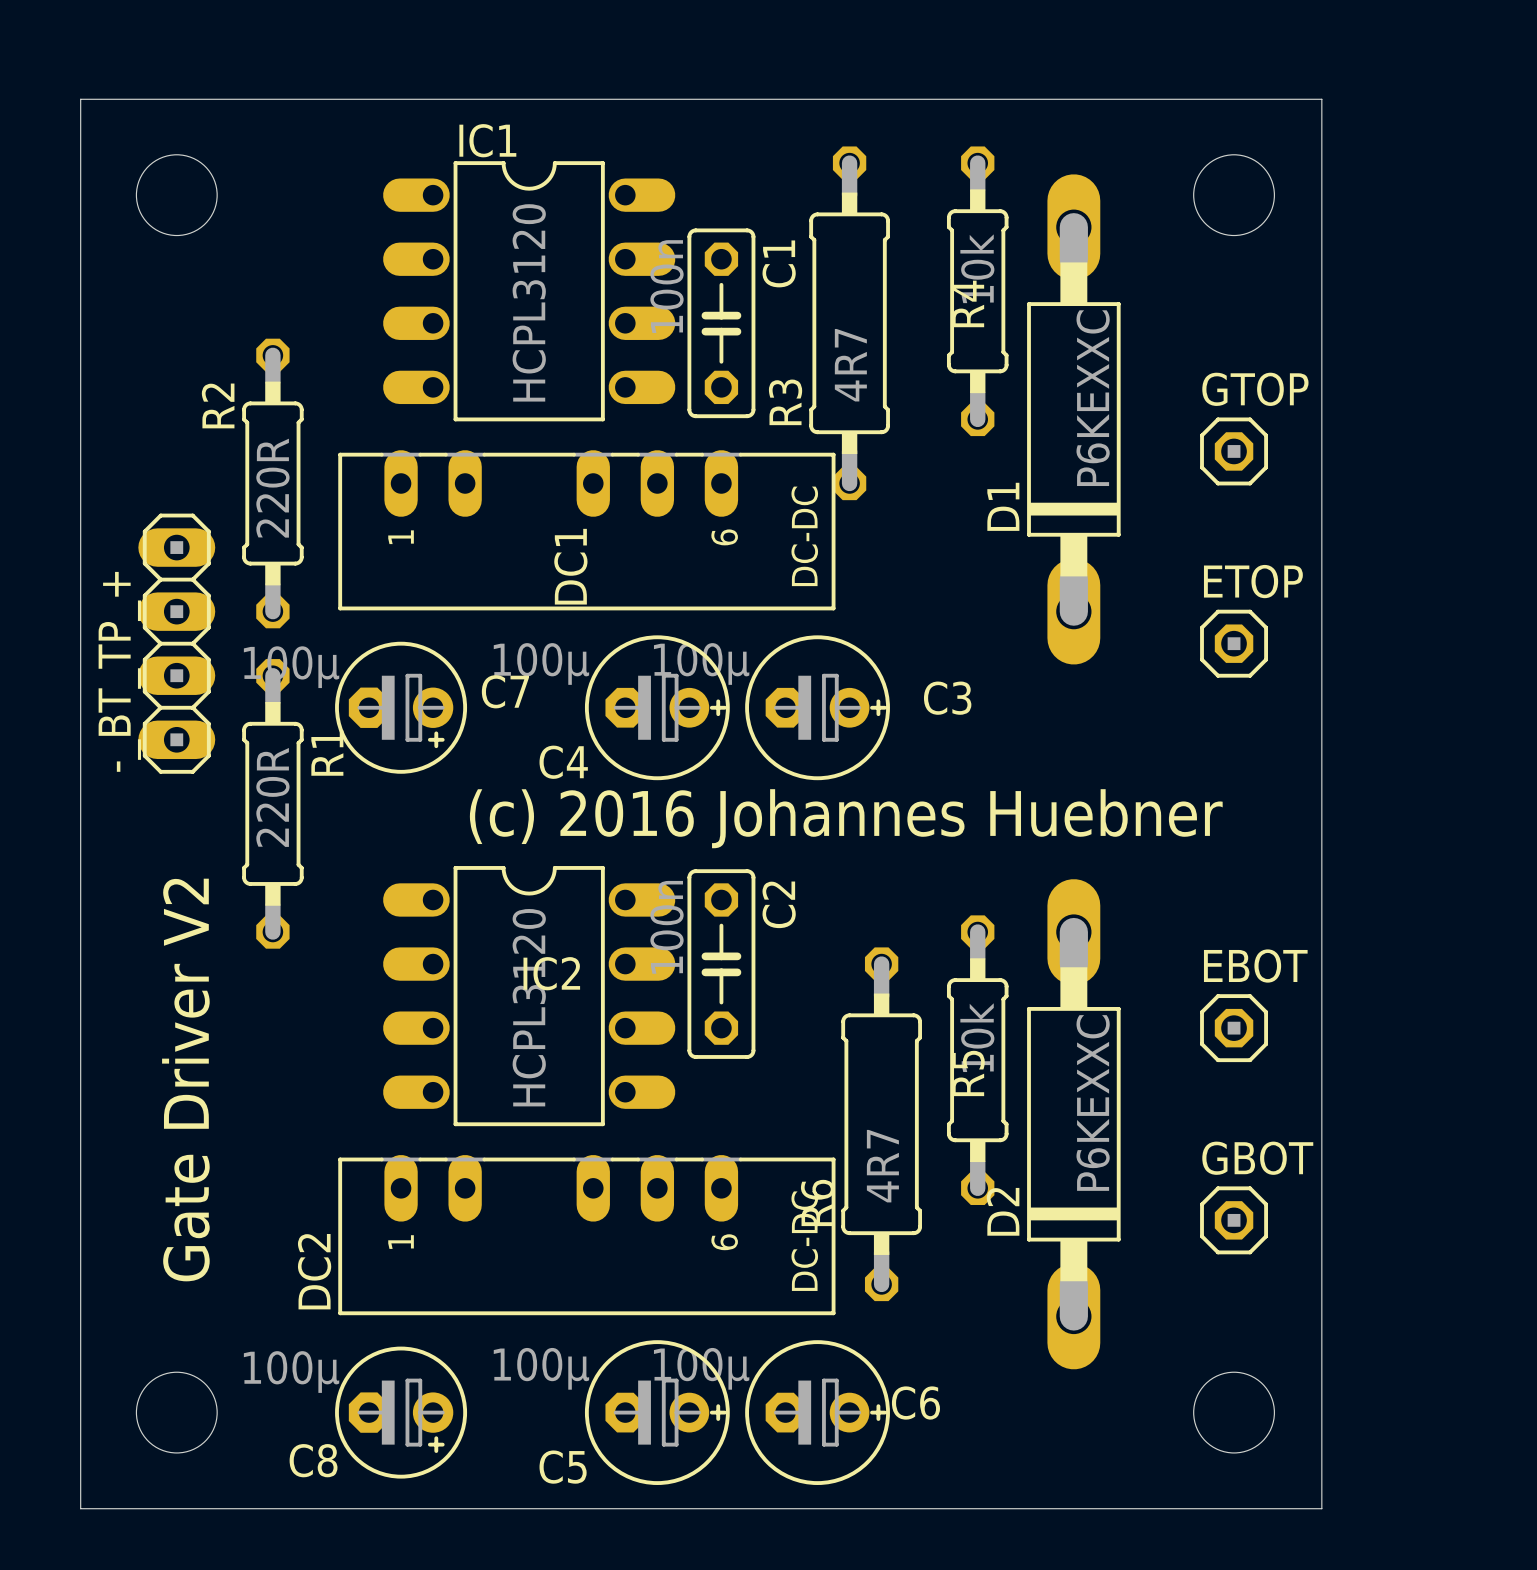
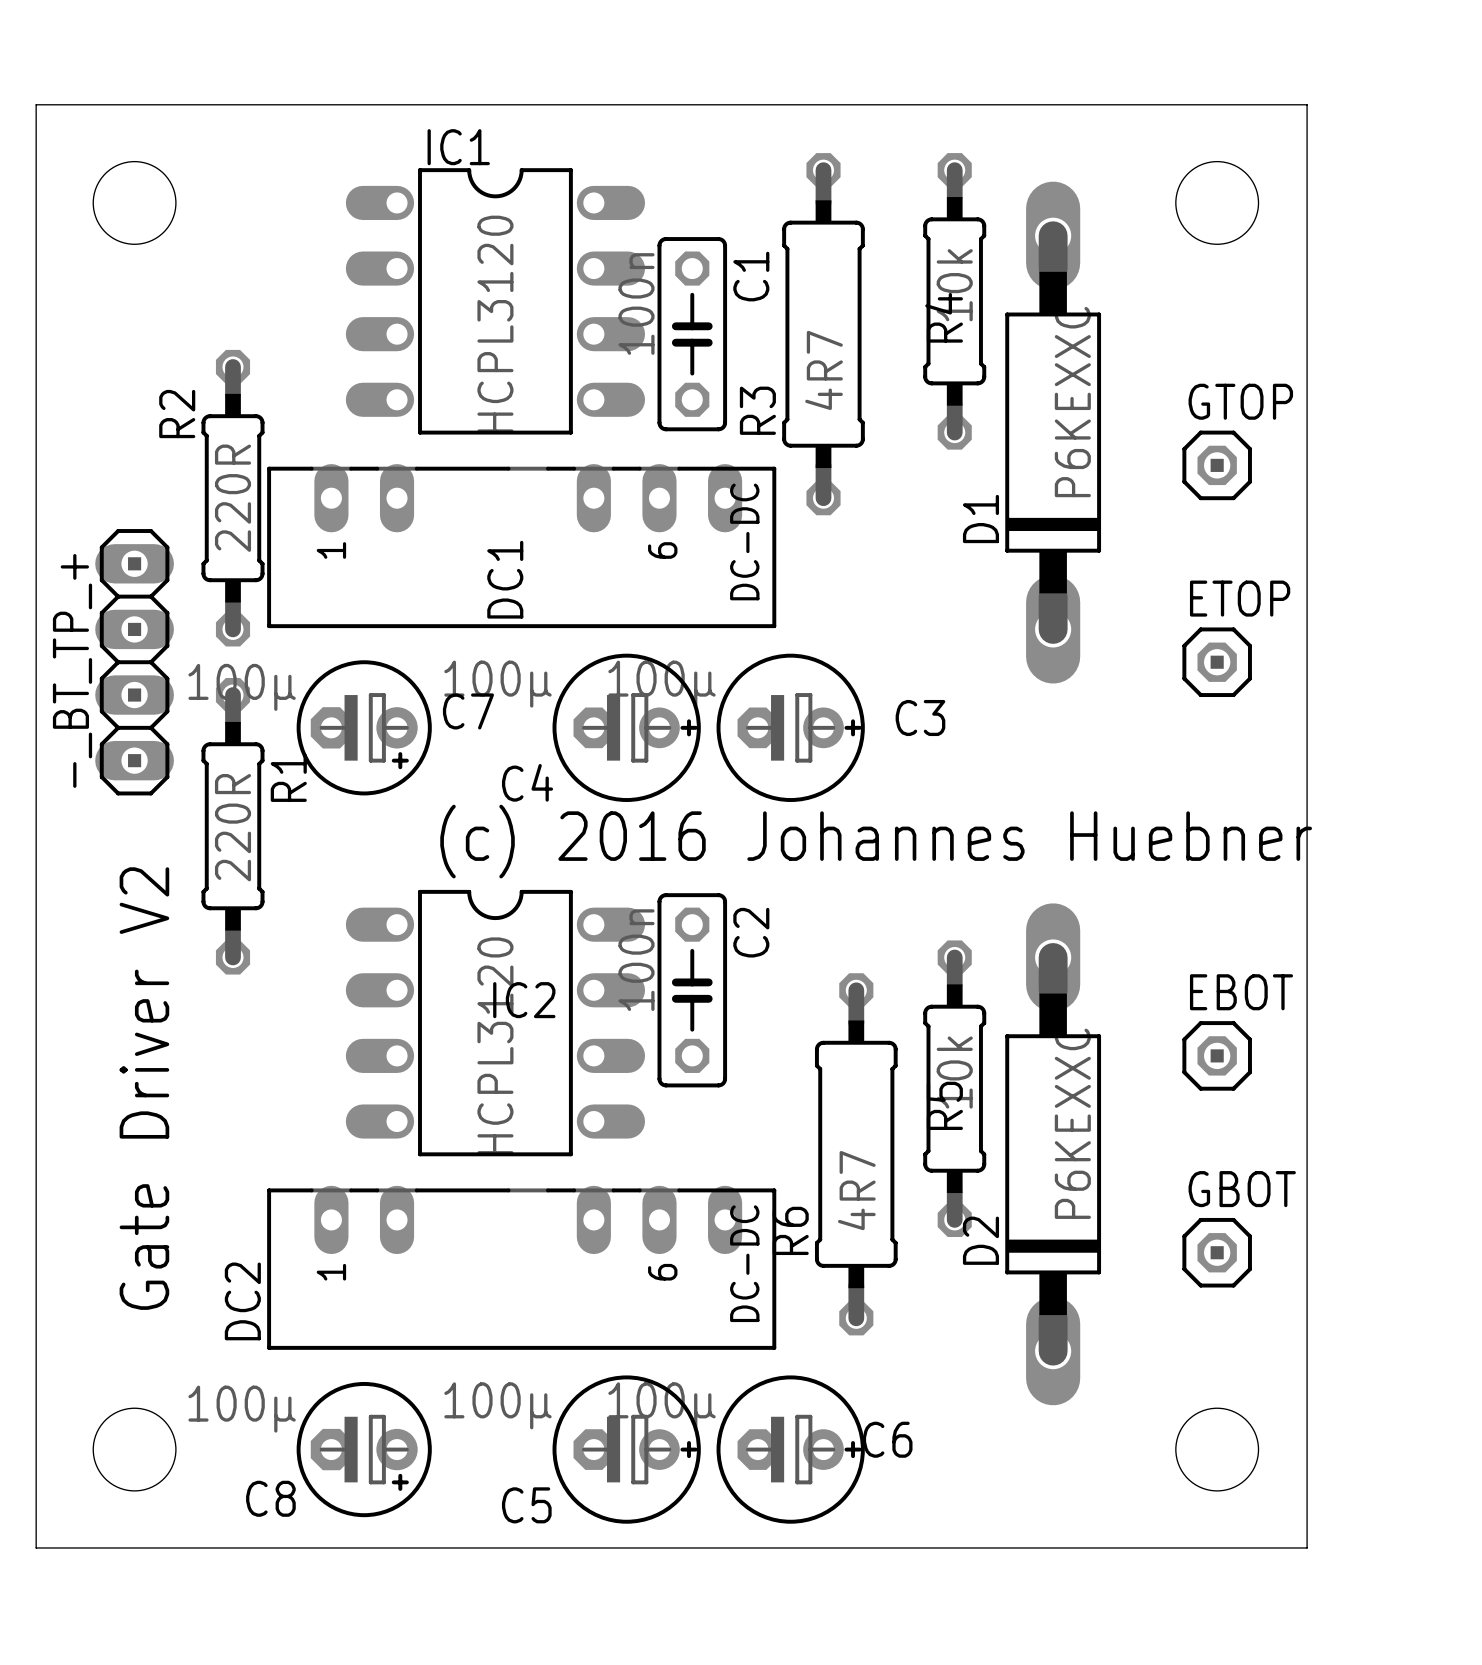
DC1 footprint: [338, 450, 836, 611] -> [267, 464, 777, 629]
DC2 footprint: [338, 1155, 836, 1316] -> [267, 1185, 777, 1350]

